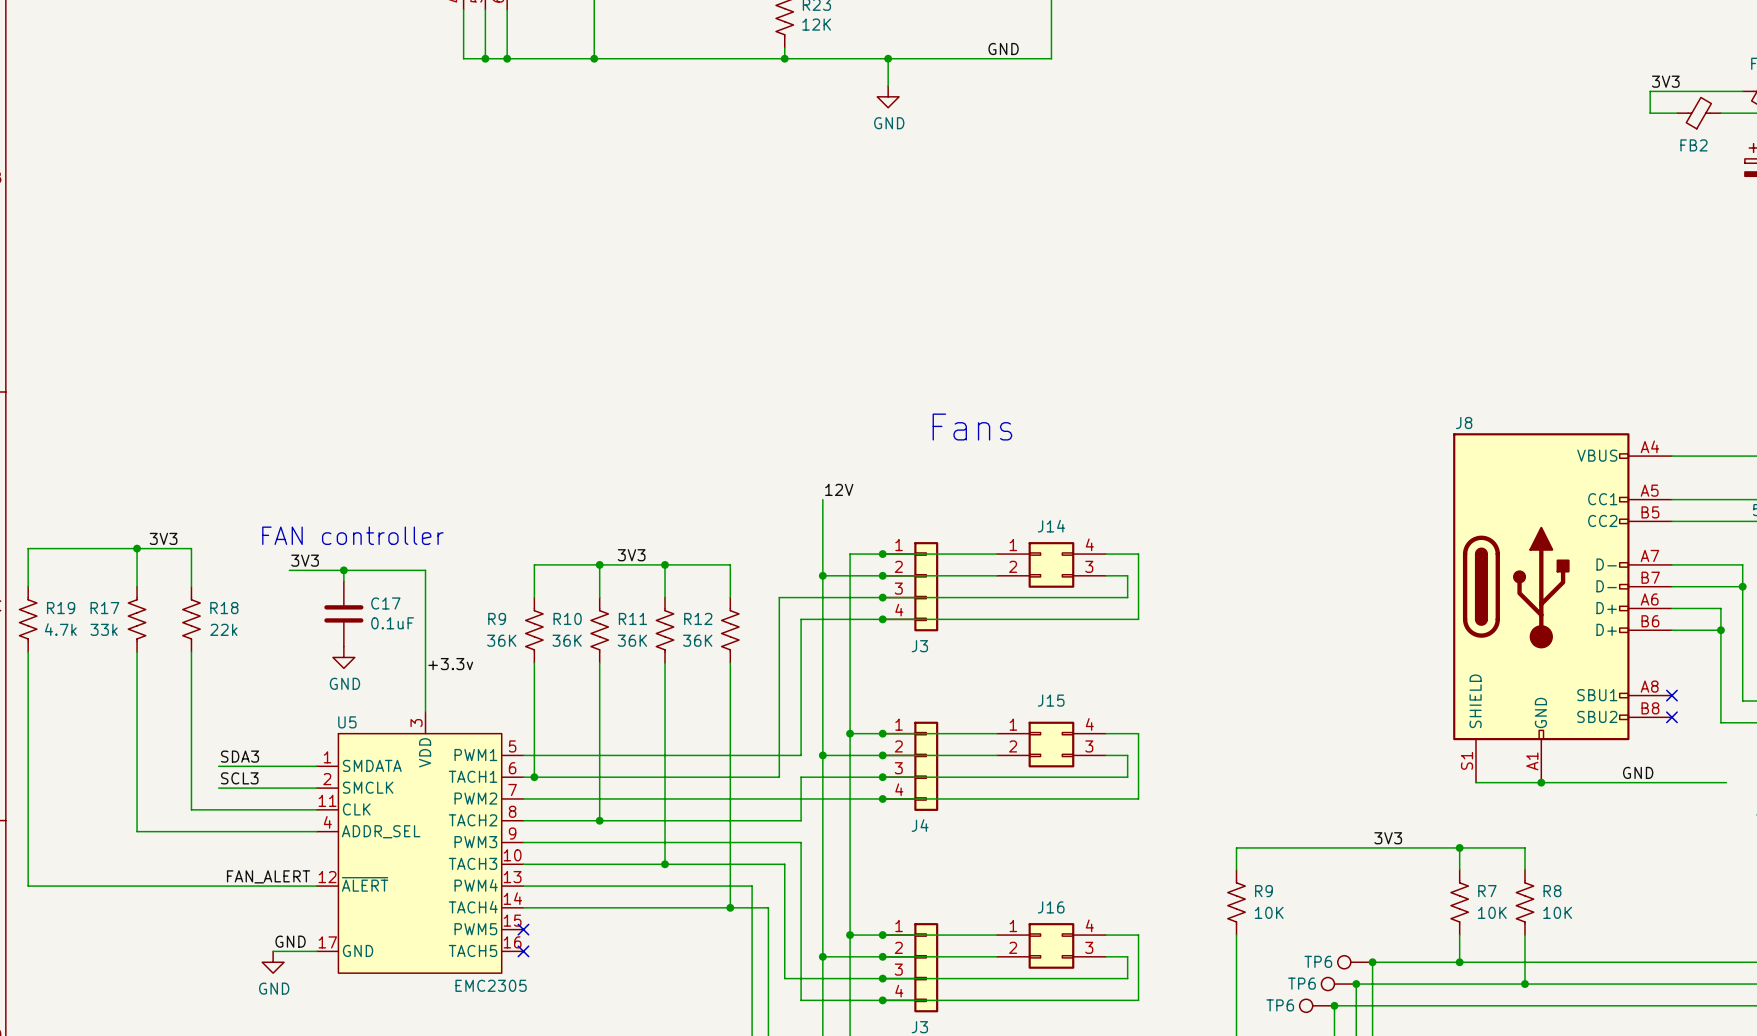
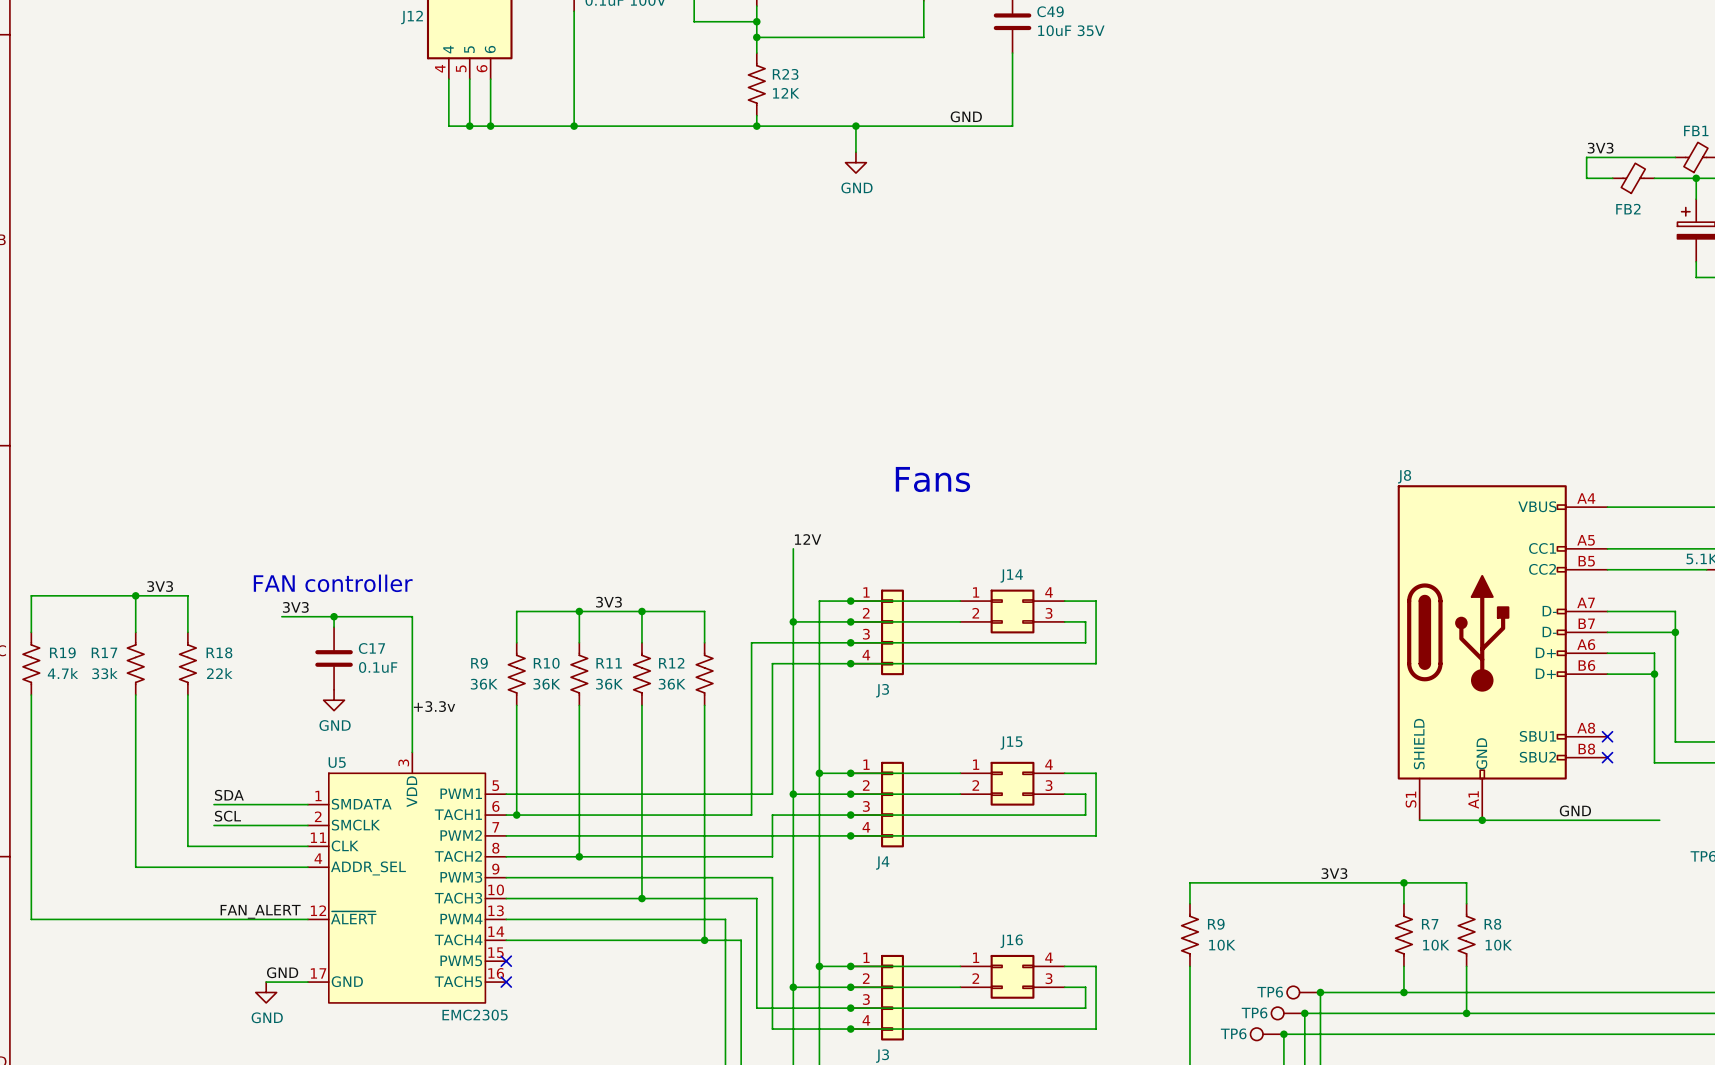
label: SDA3 (240, 756) -> SDA (229, 795)
label: SCL3 (239, 778) -> SCL (227, 816)

